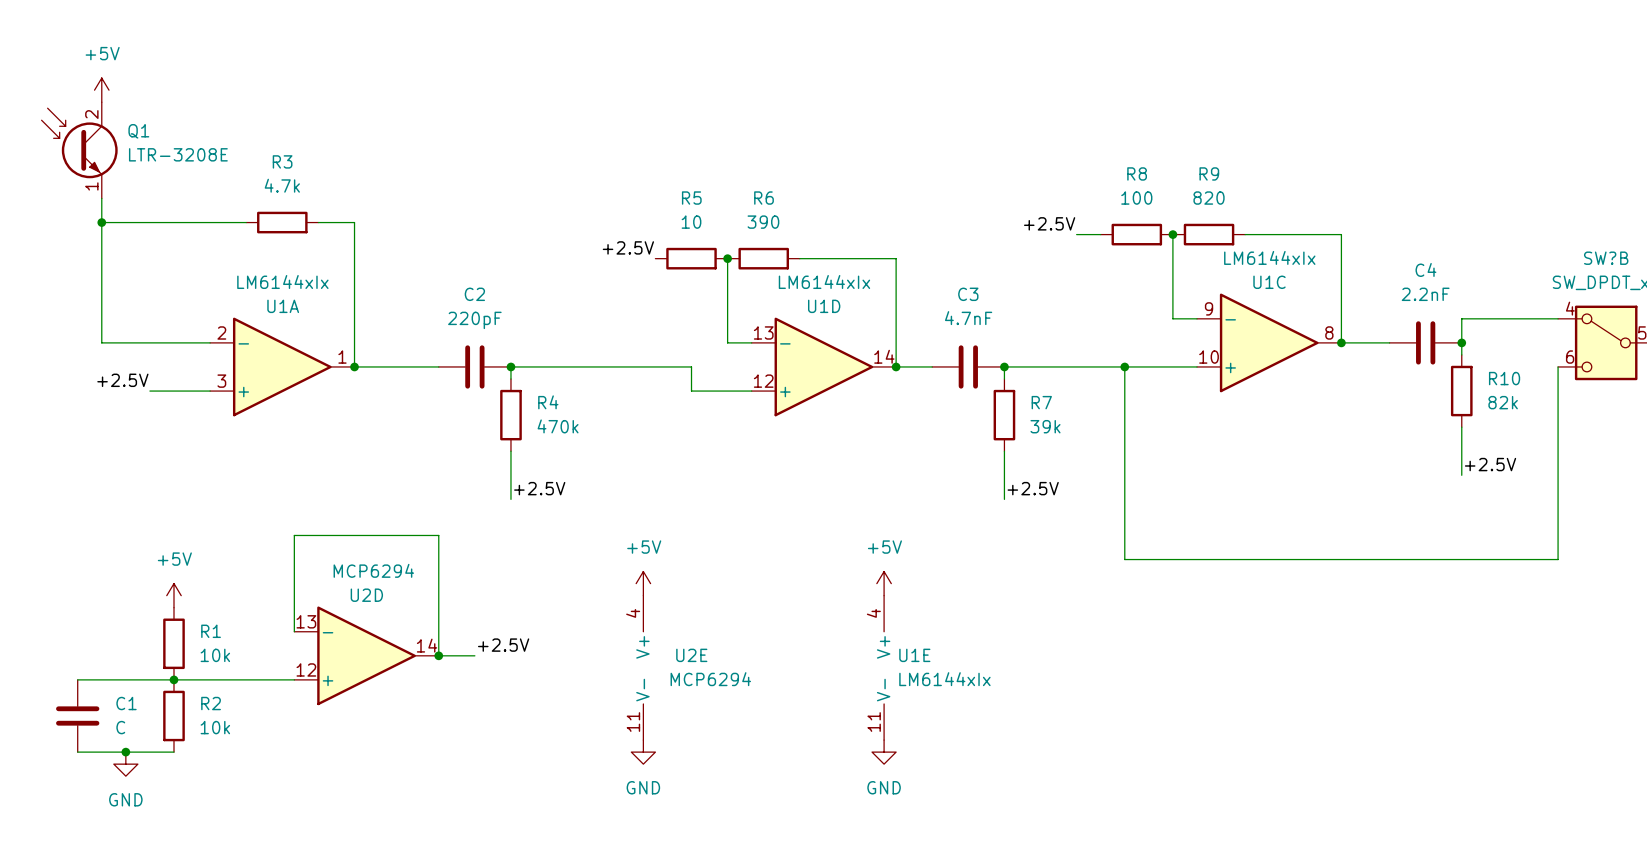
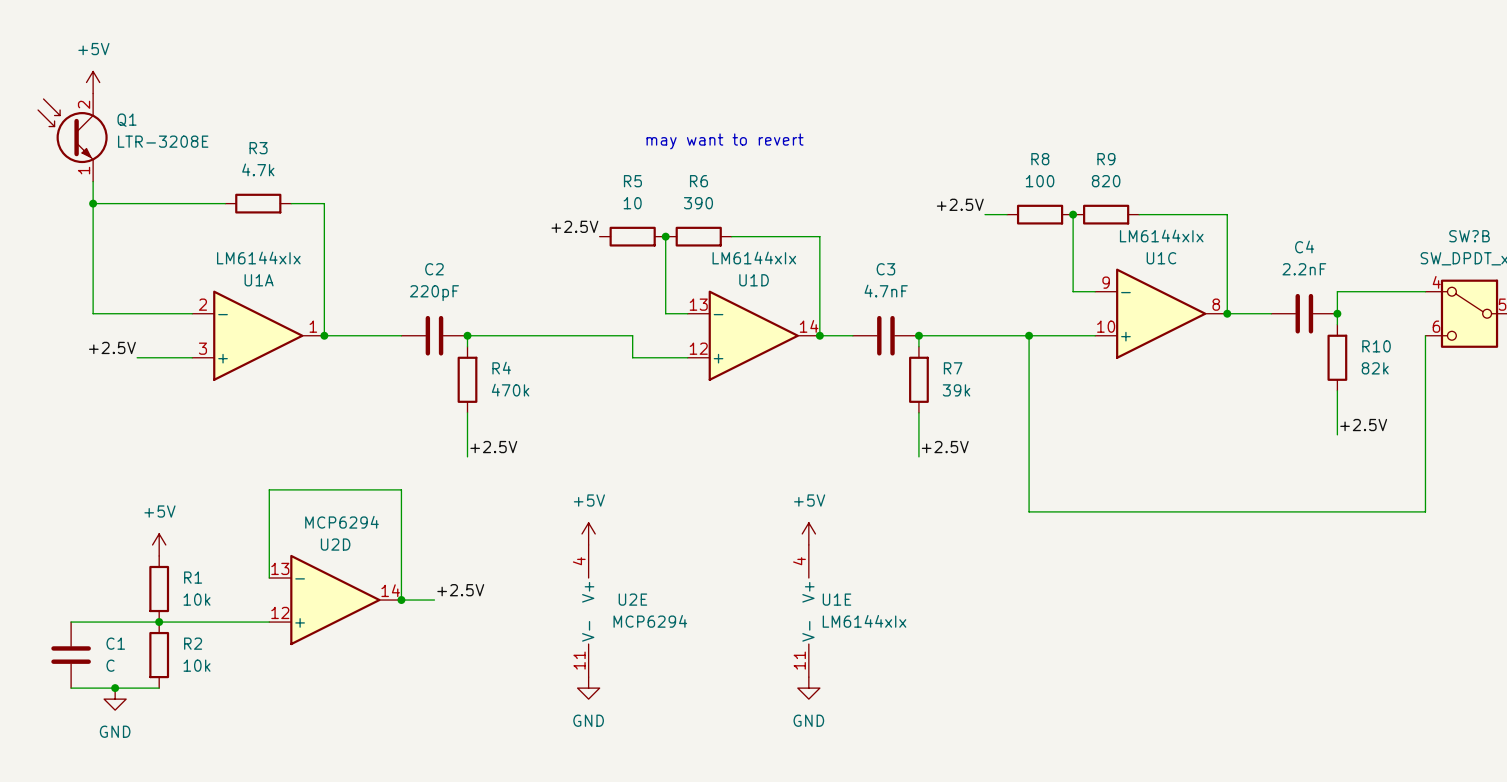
text: none -> may want to revert (725, 141)

